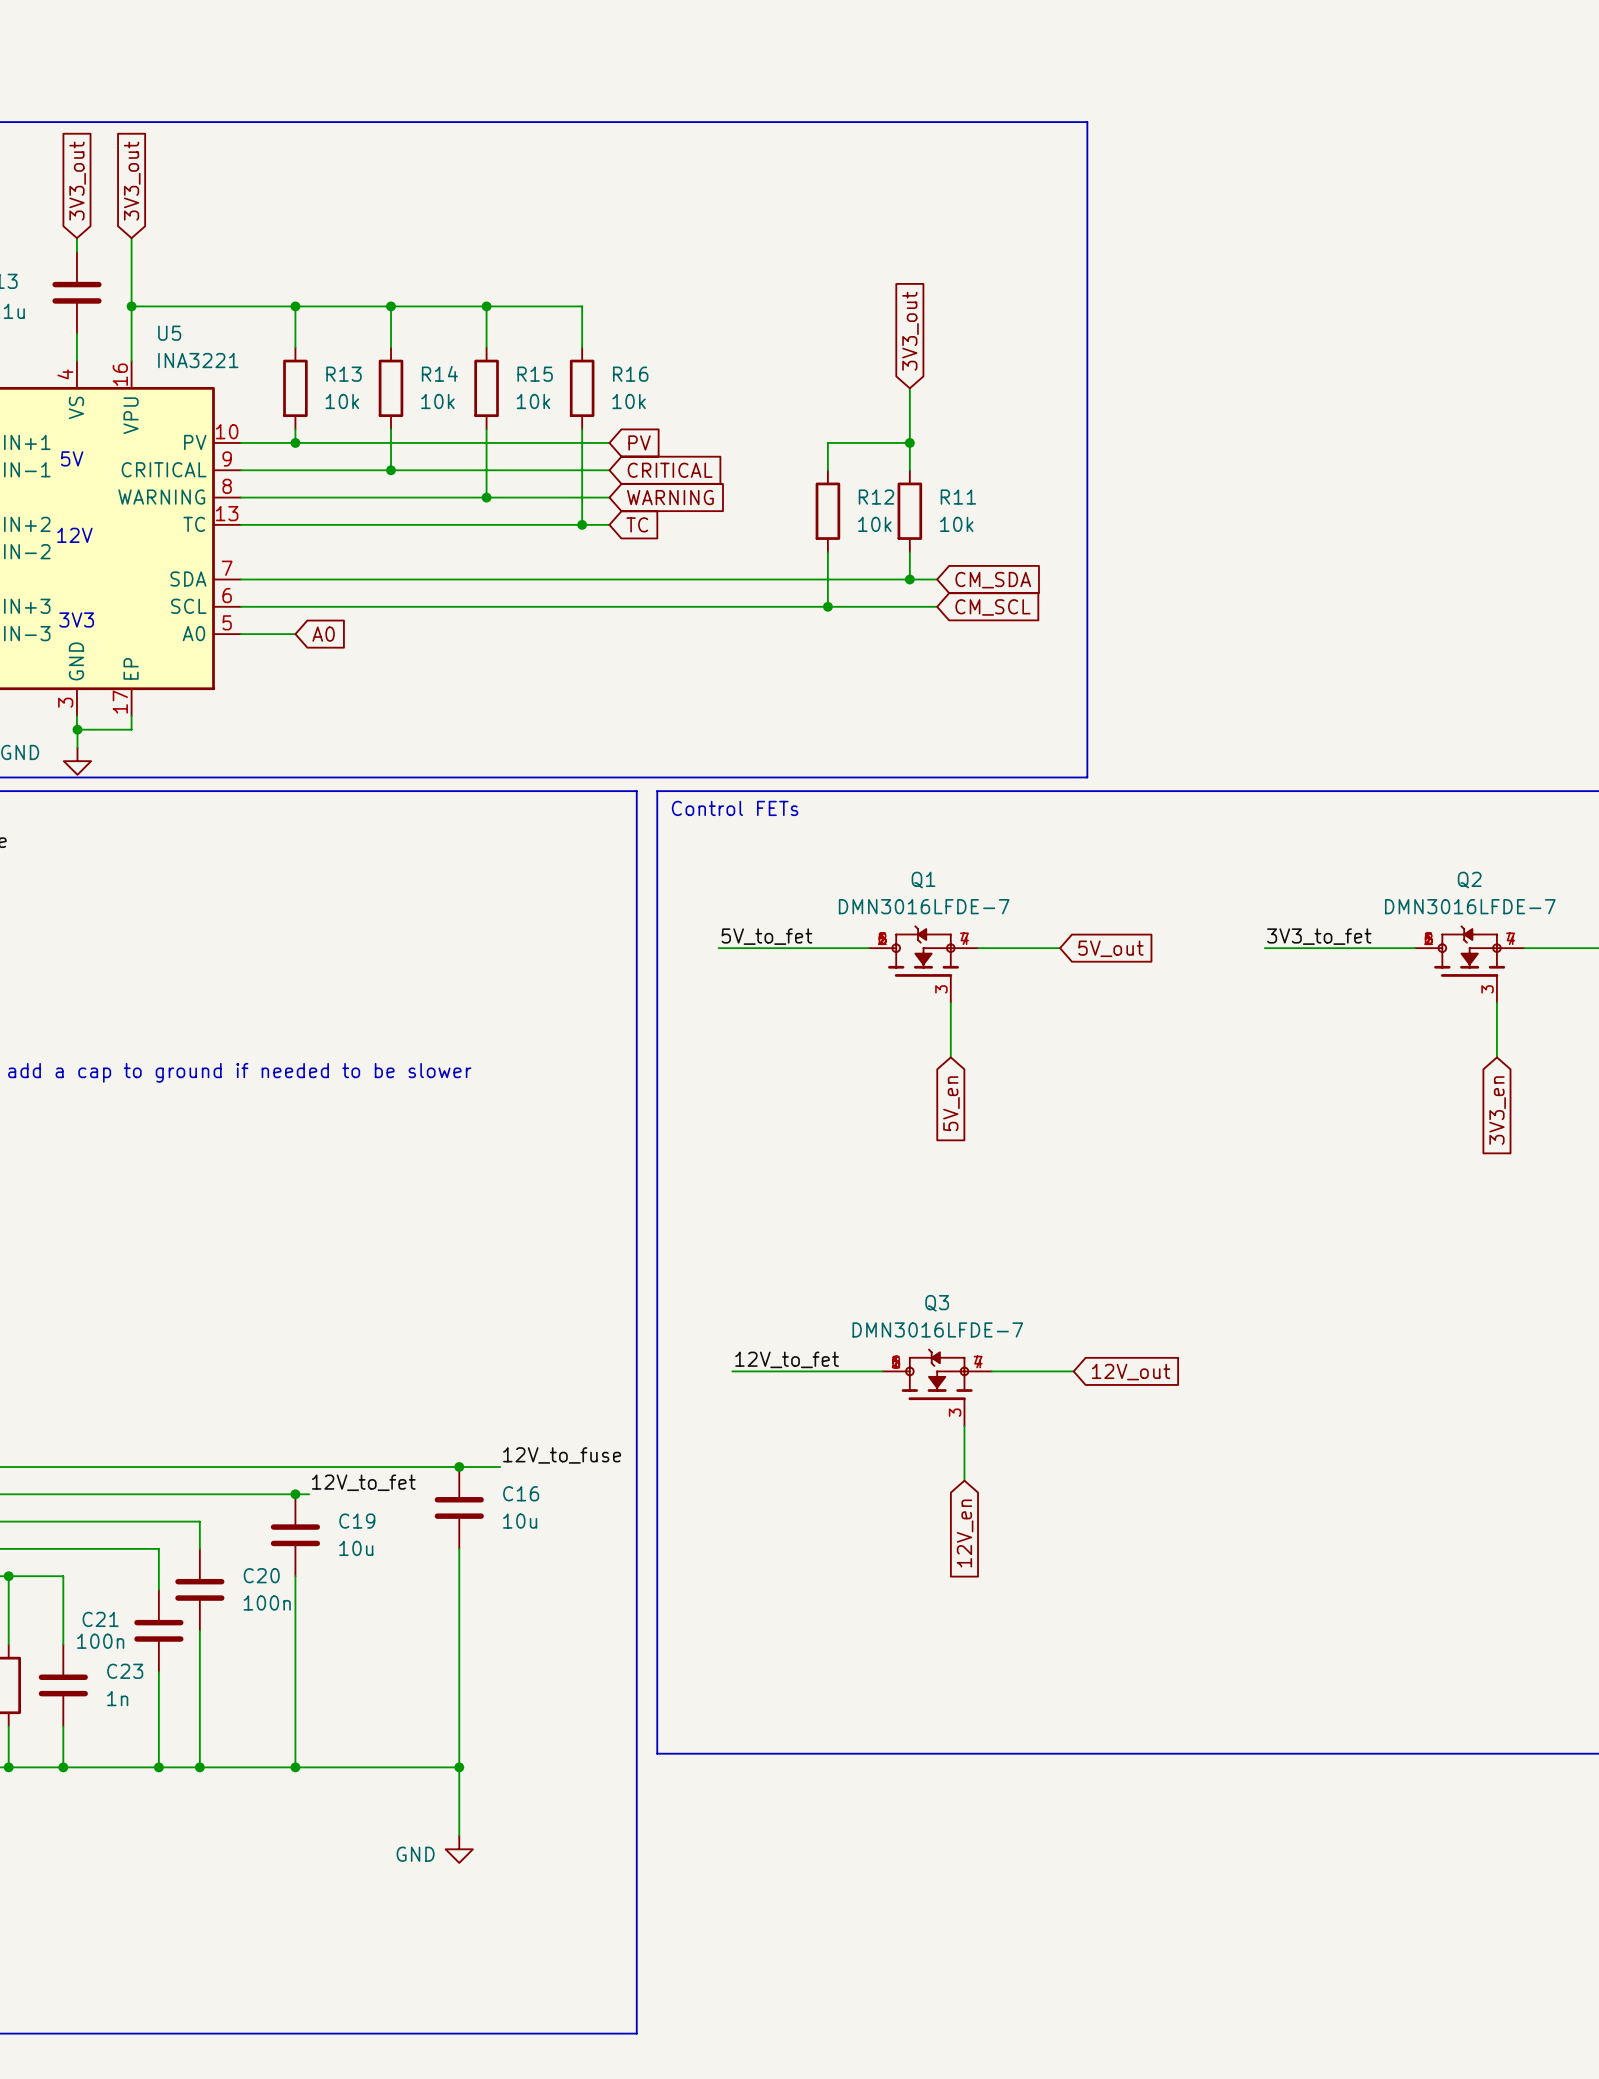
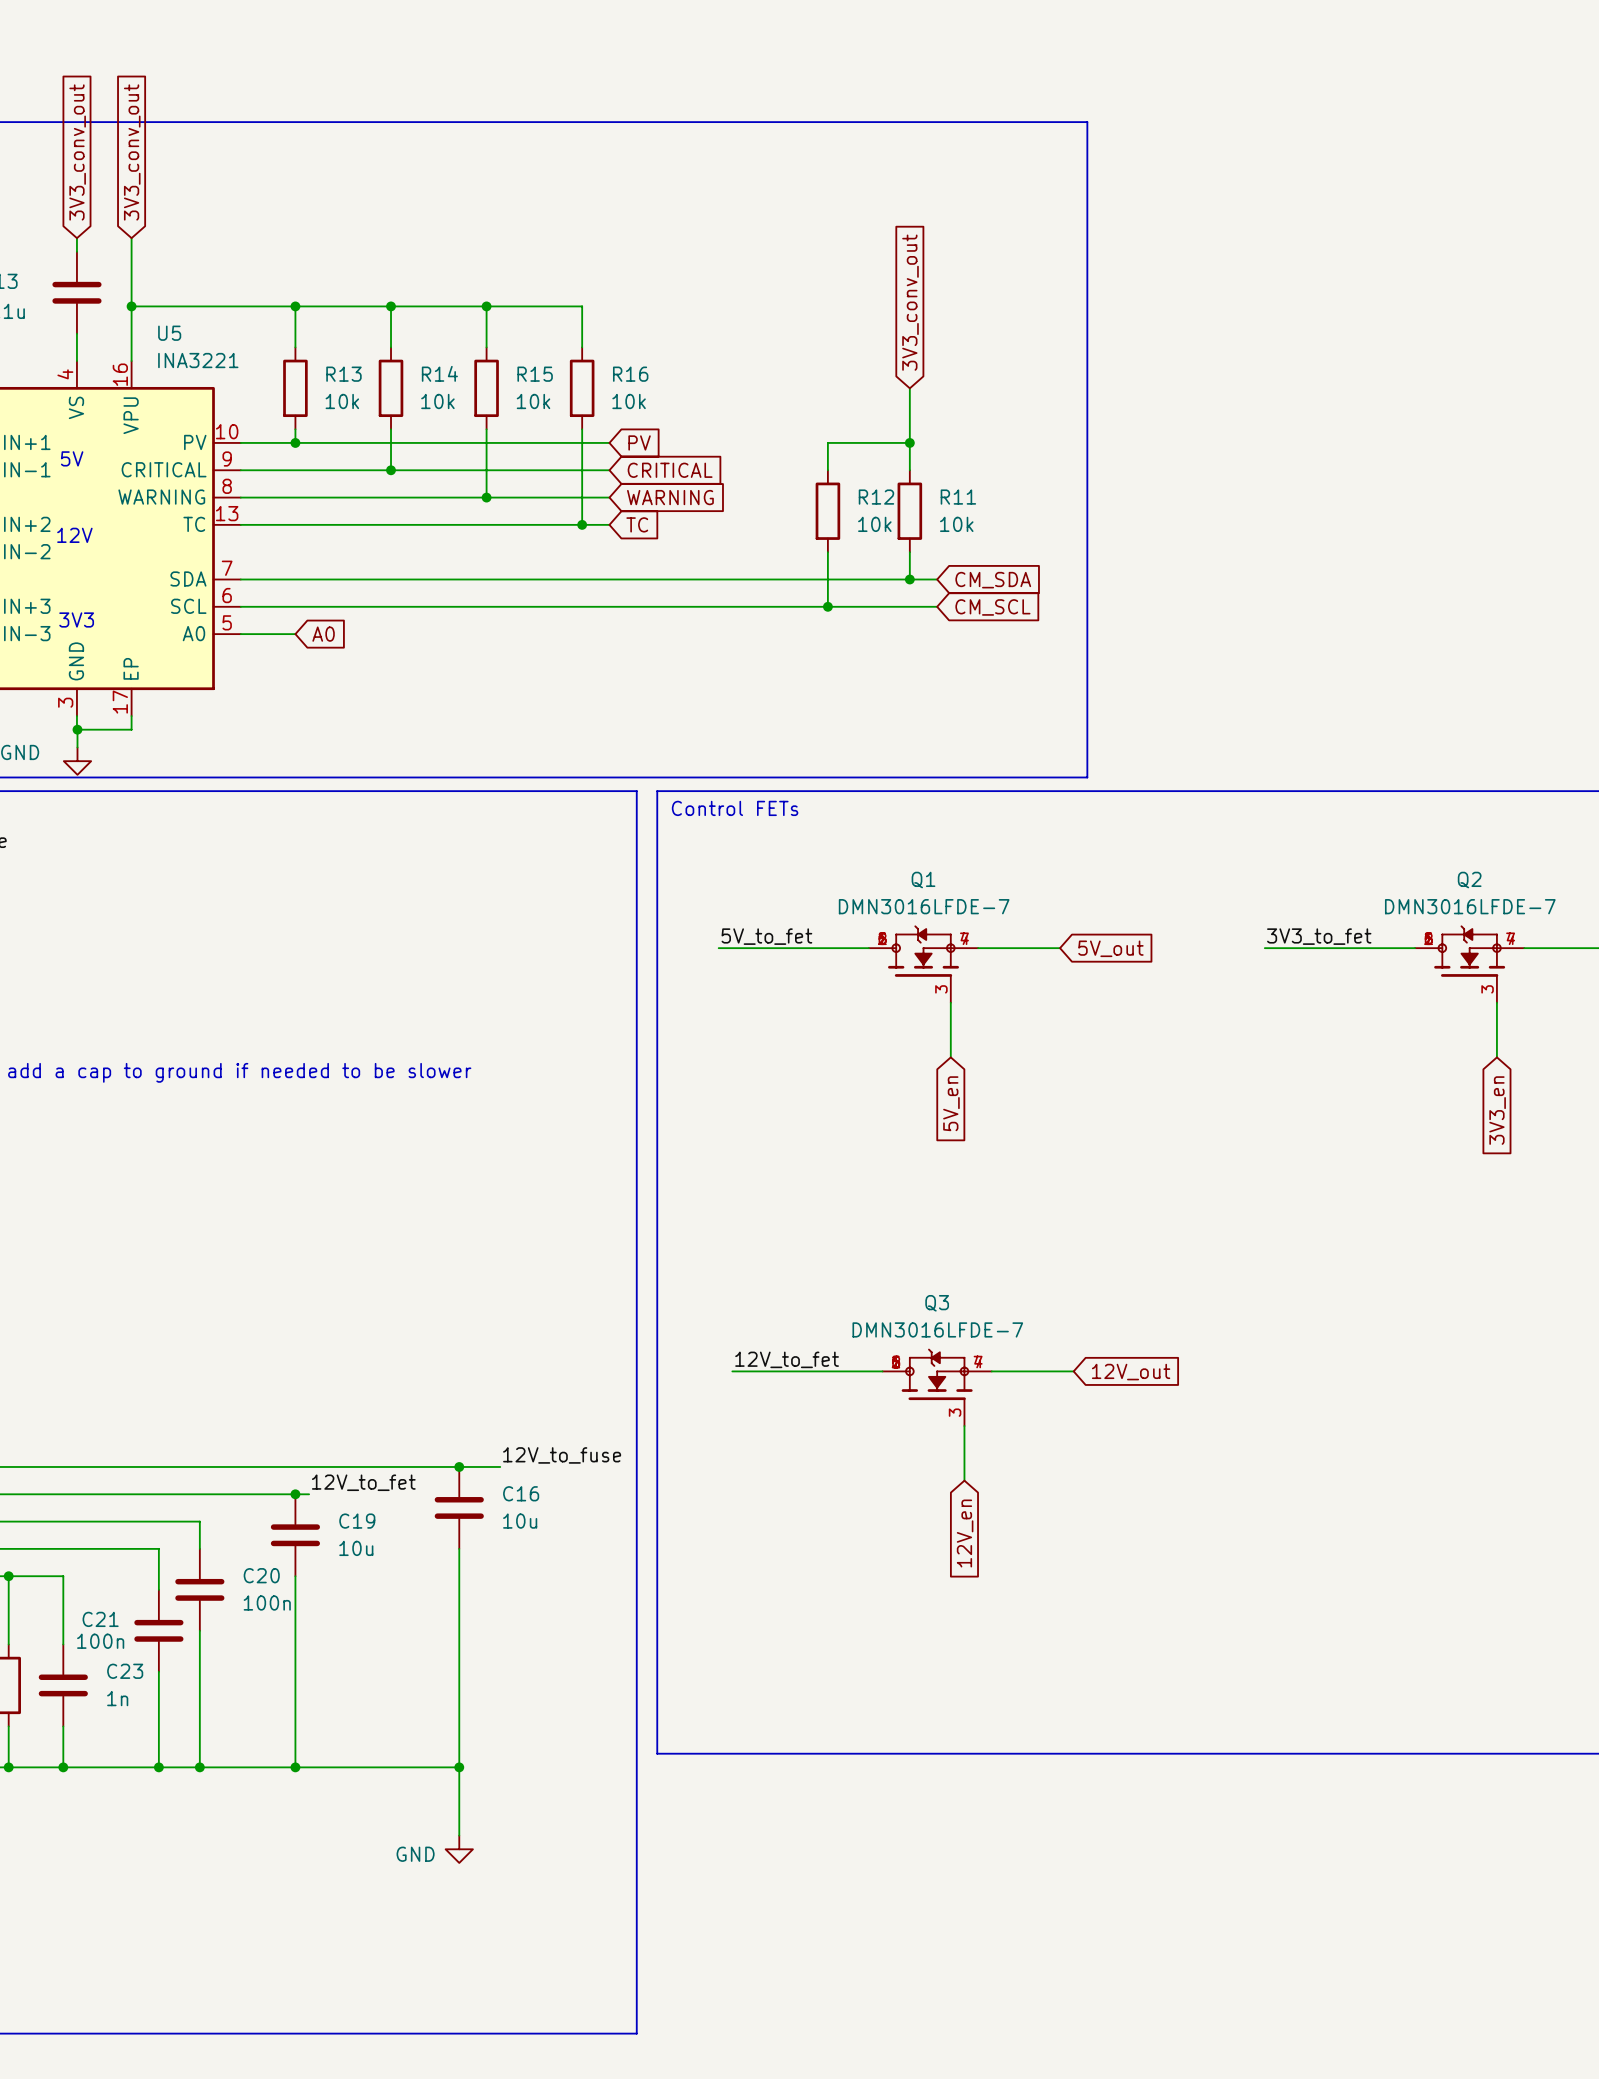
global label: 3V3_out (77, 181) -> 3V3_conv_out (77, 152)
global label: 3V3_out (132, 181) -> 3V3_conv_out (132, 152)
global label: 3V3_out (910, 331) -> 3V3_conv_out (910, 302)

